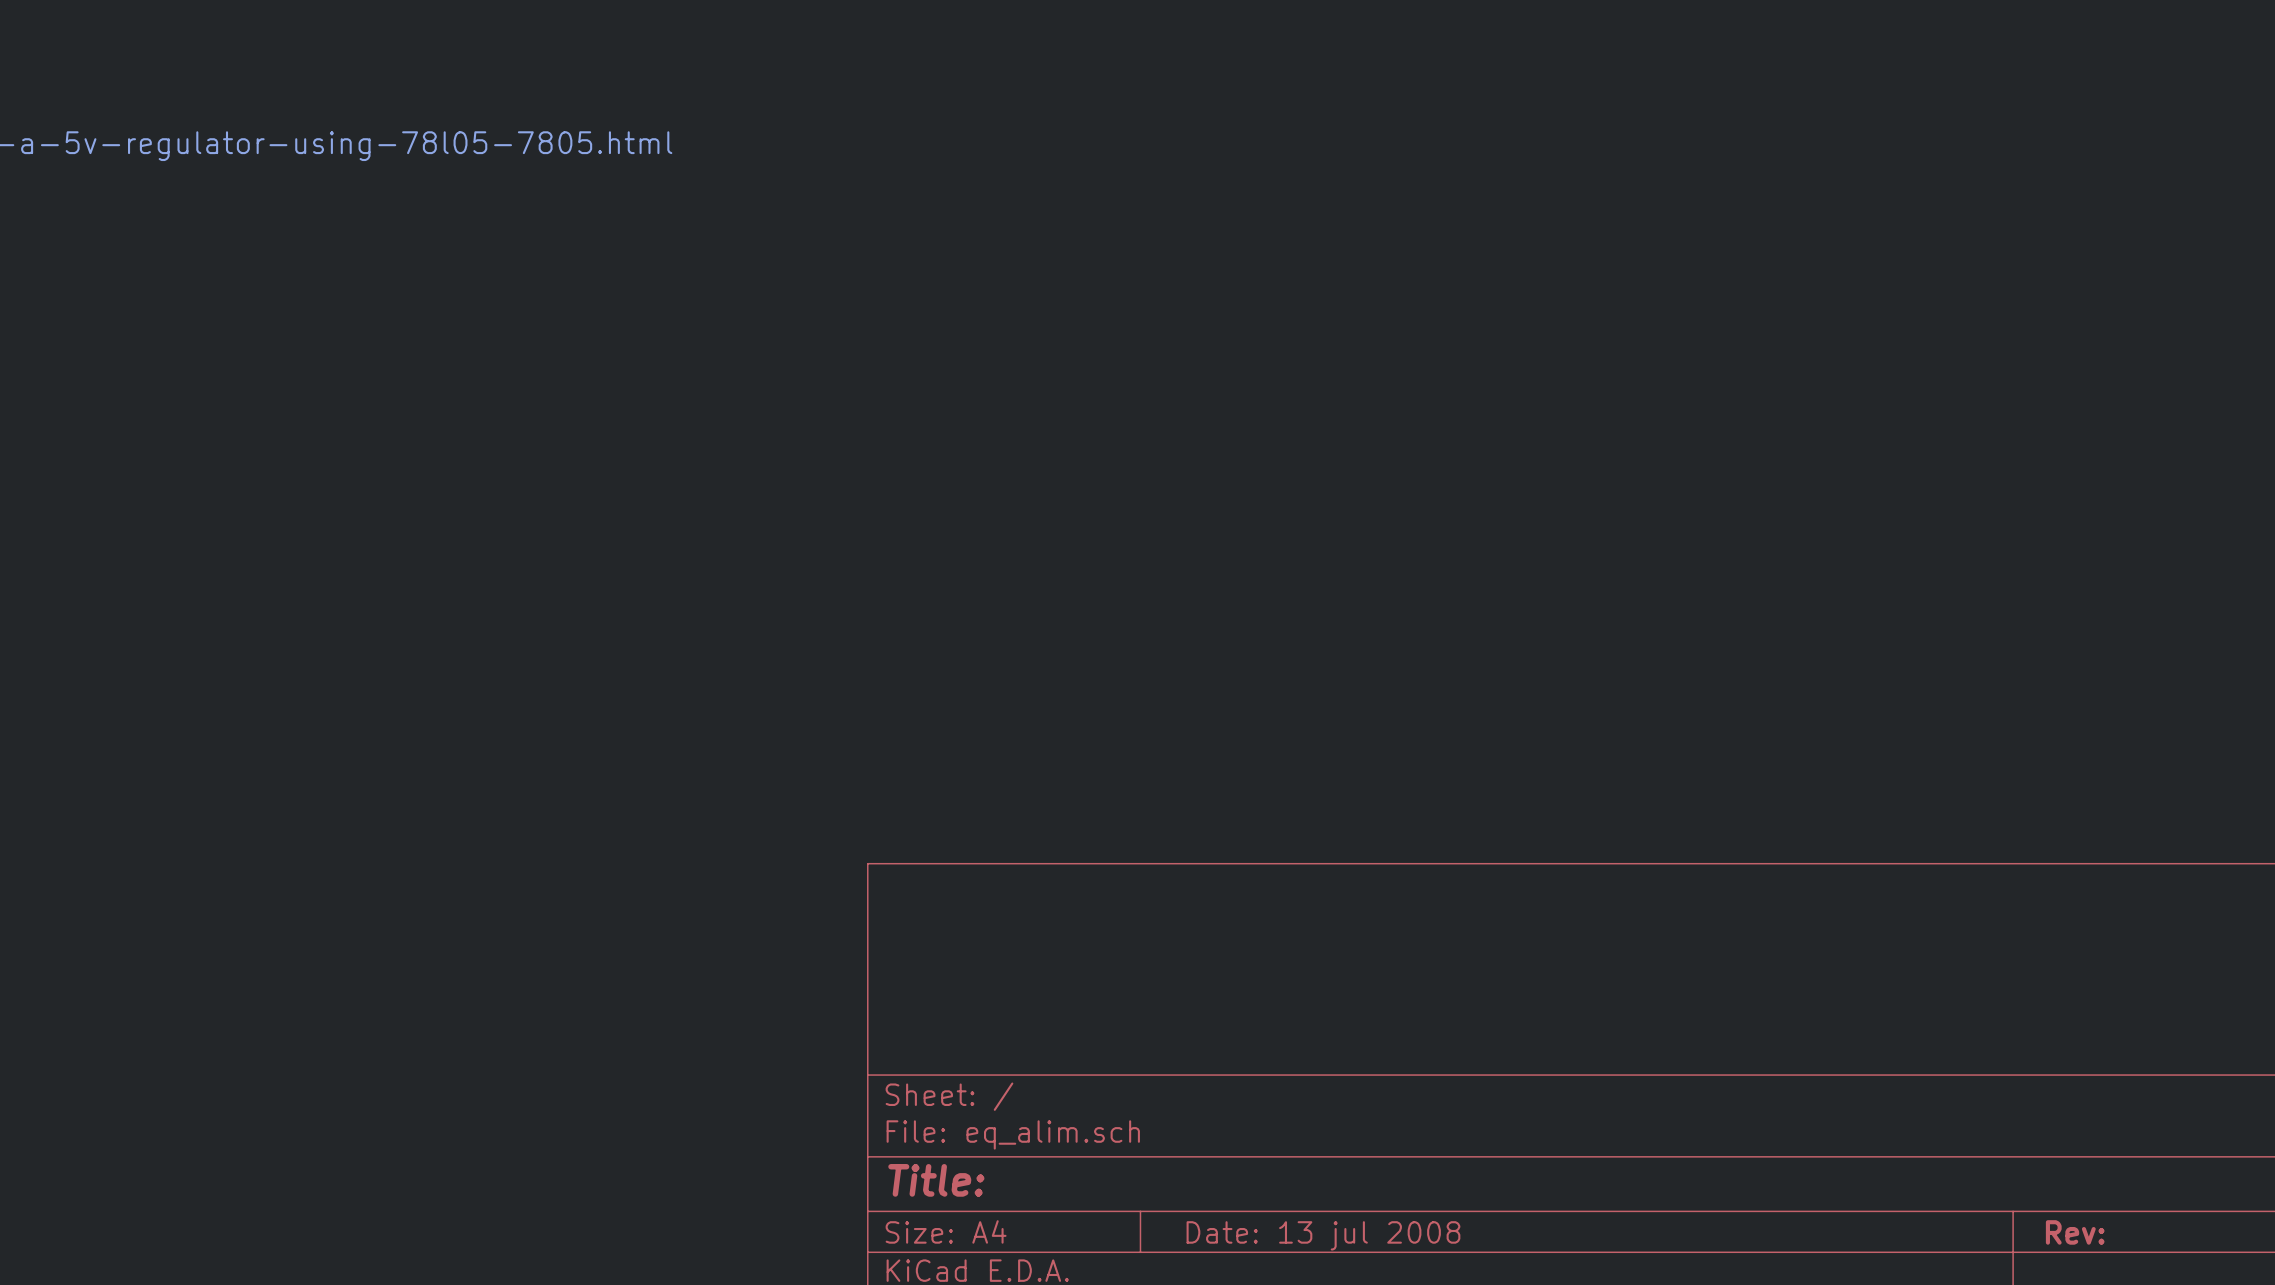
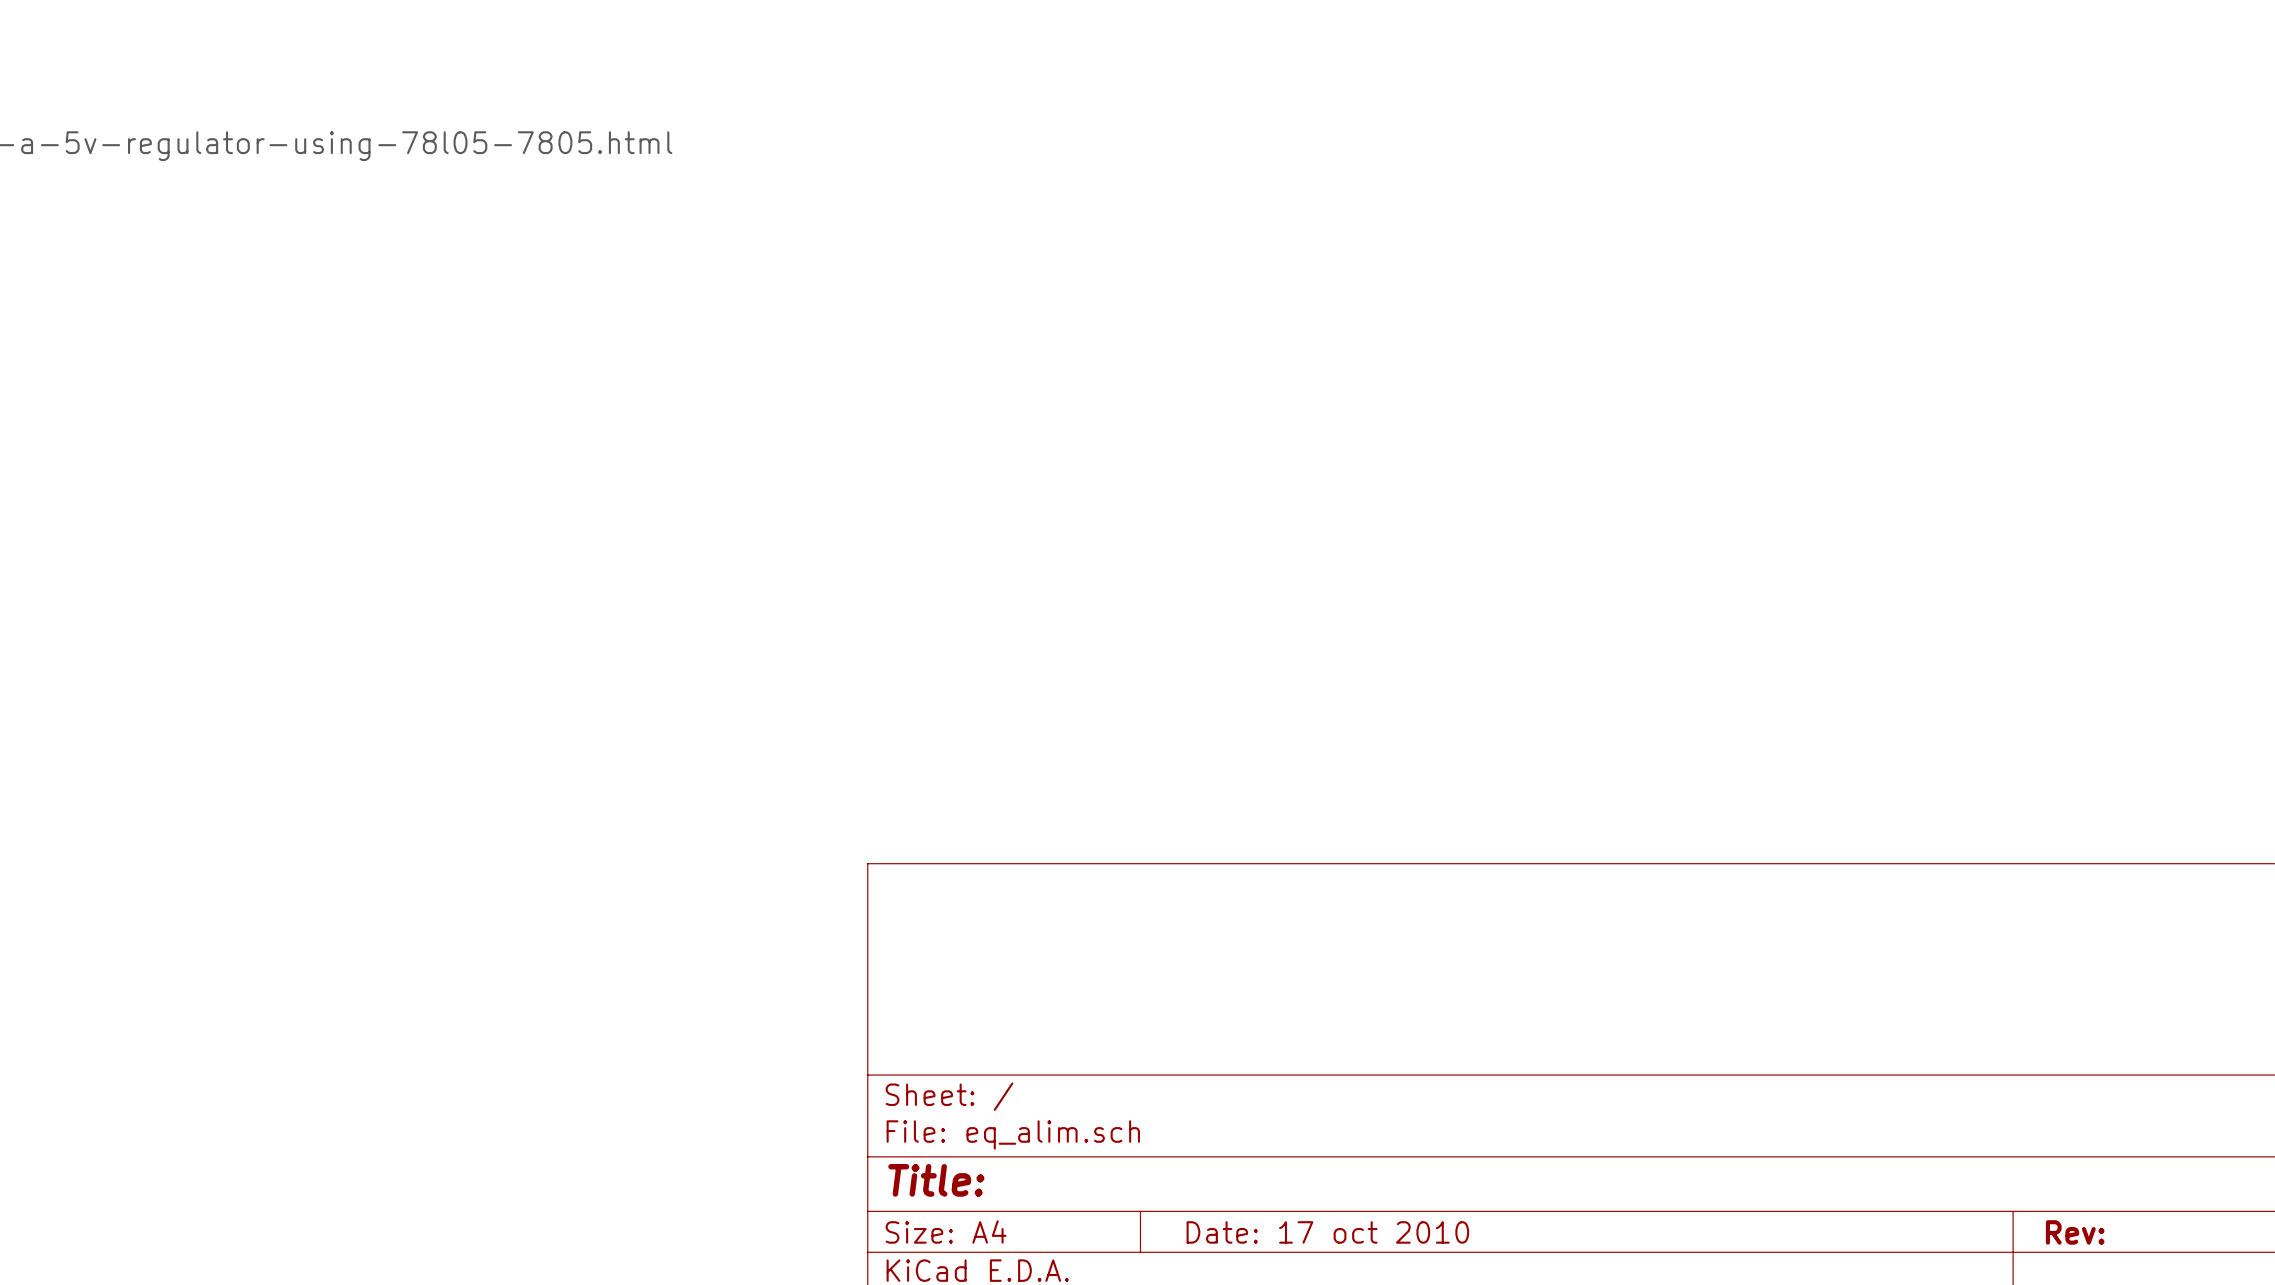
title block: Date: 13 jul 2008 (1323, 1235) -> Date: 17 oct 2010 (1327, 1232)

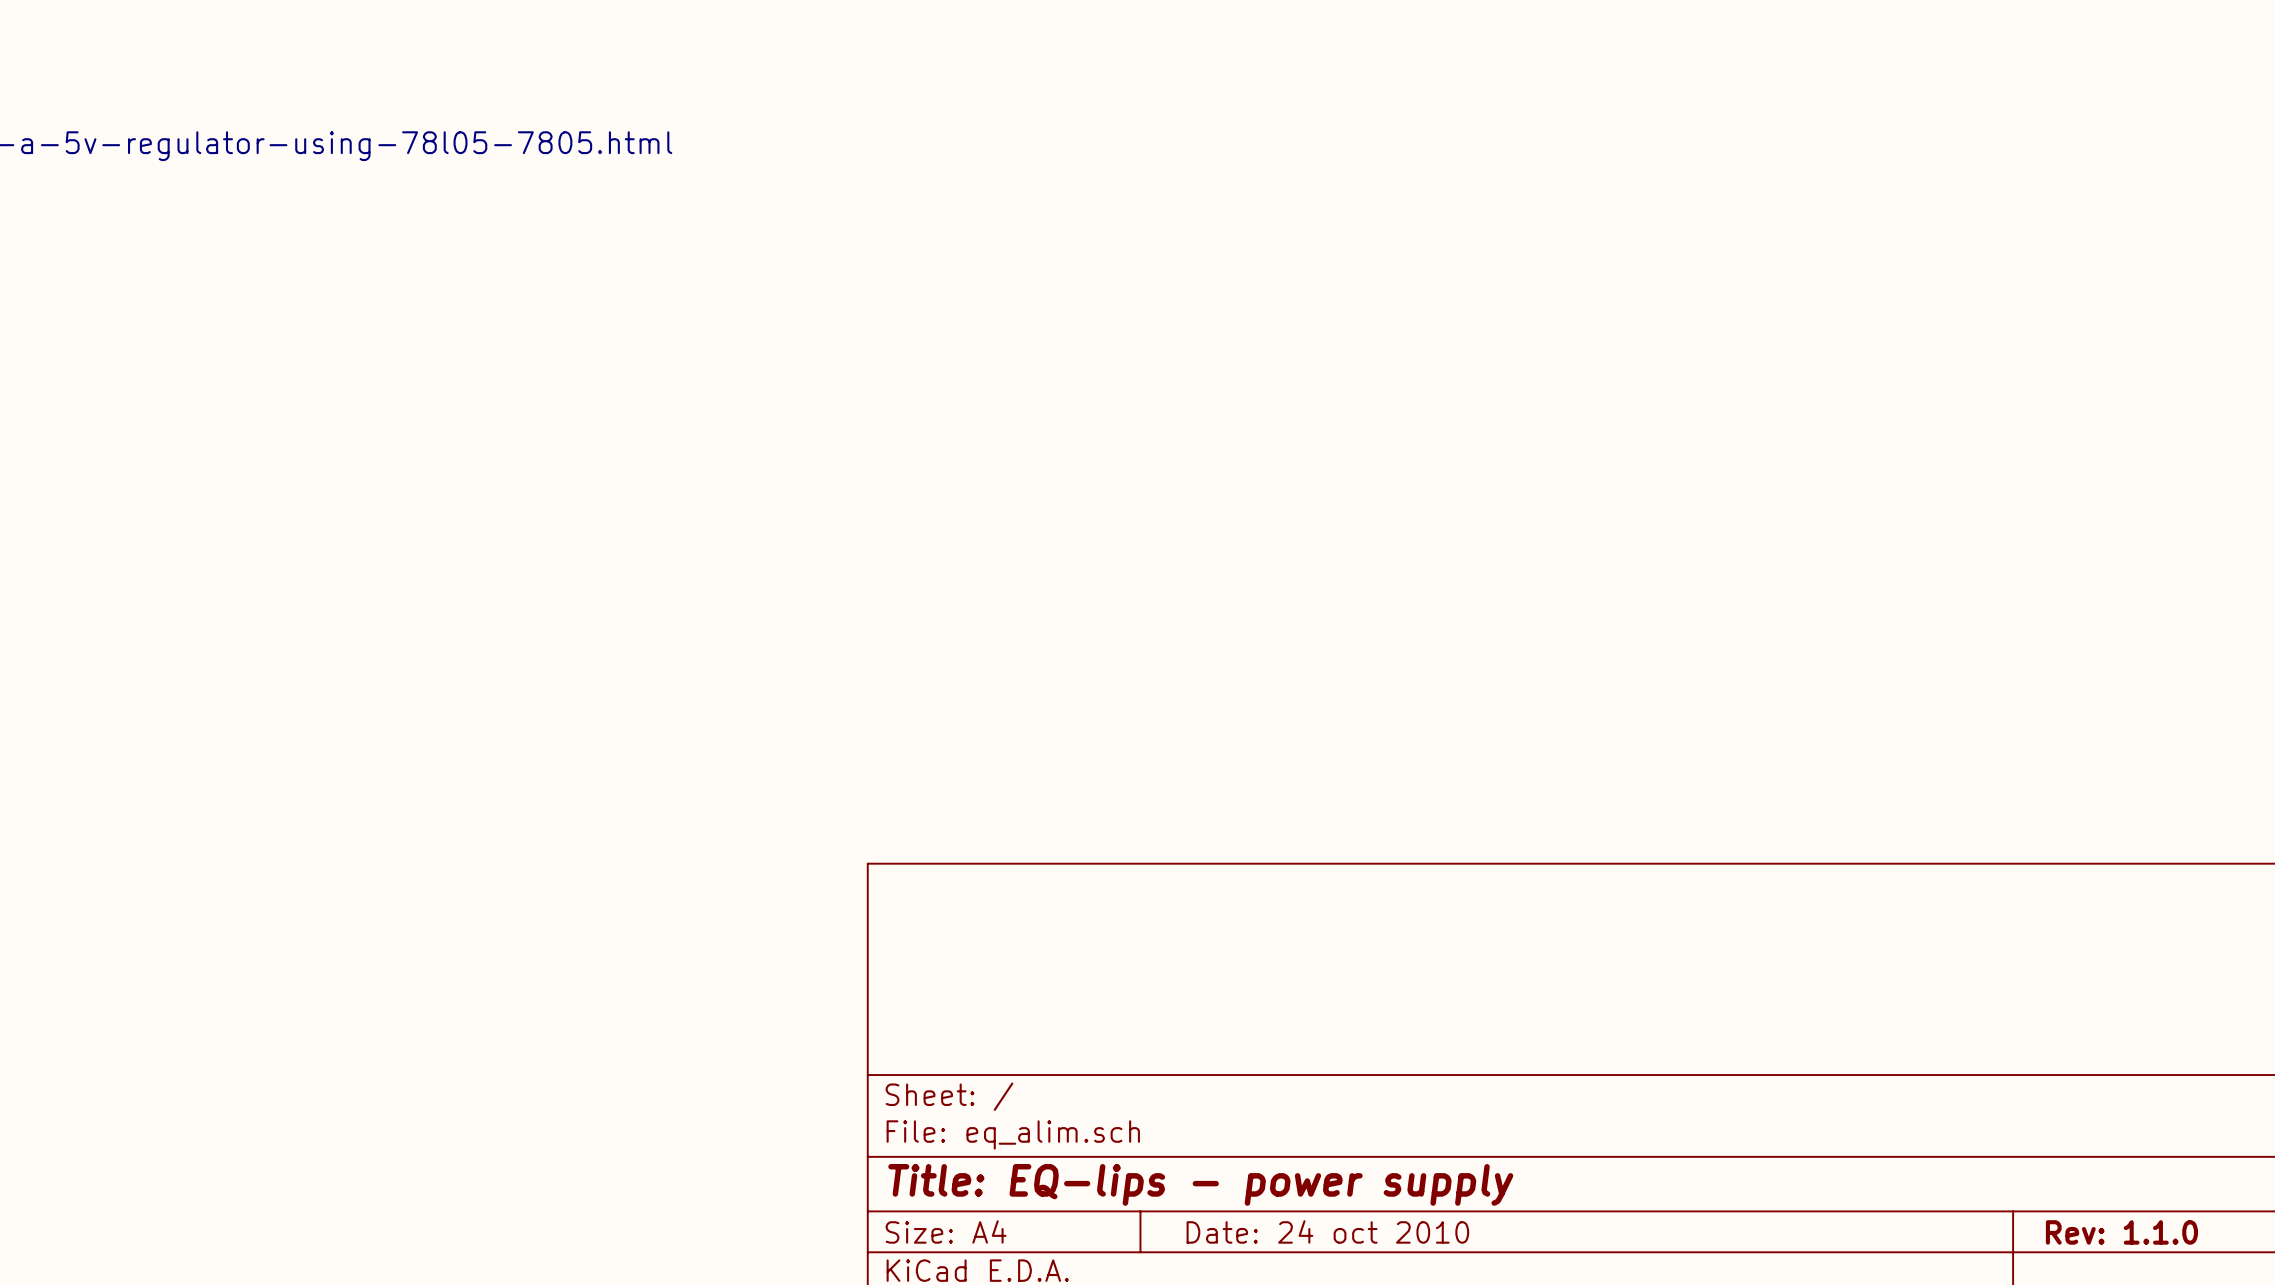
title block: Title: (936, 1180) -> Title: EQ-lips - power supply (1200, 1184)
title block: Date: 17 oct 2010 (1327, 1232) -> Date: 24 oct 2010 (1327, 1231)
title block: Rev: (2075, 1232) -> Rev: 1.1.0 (2121, 1232)

